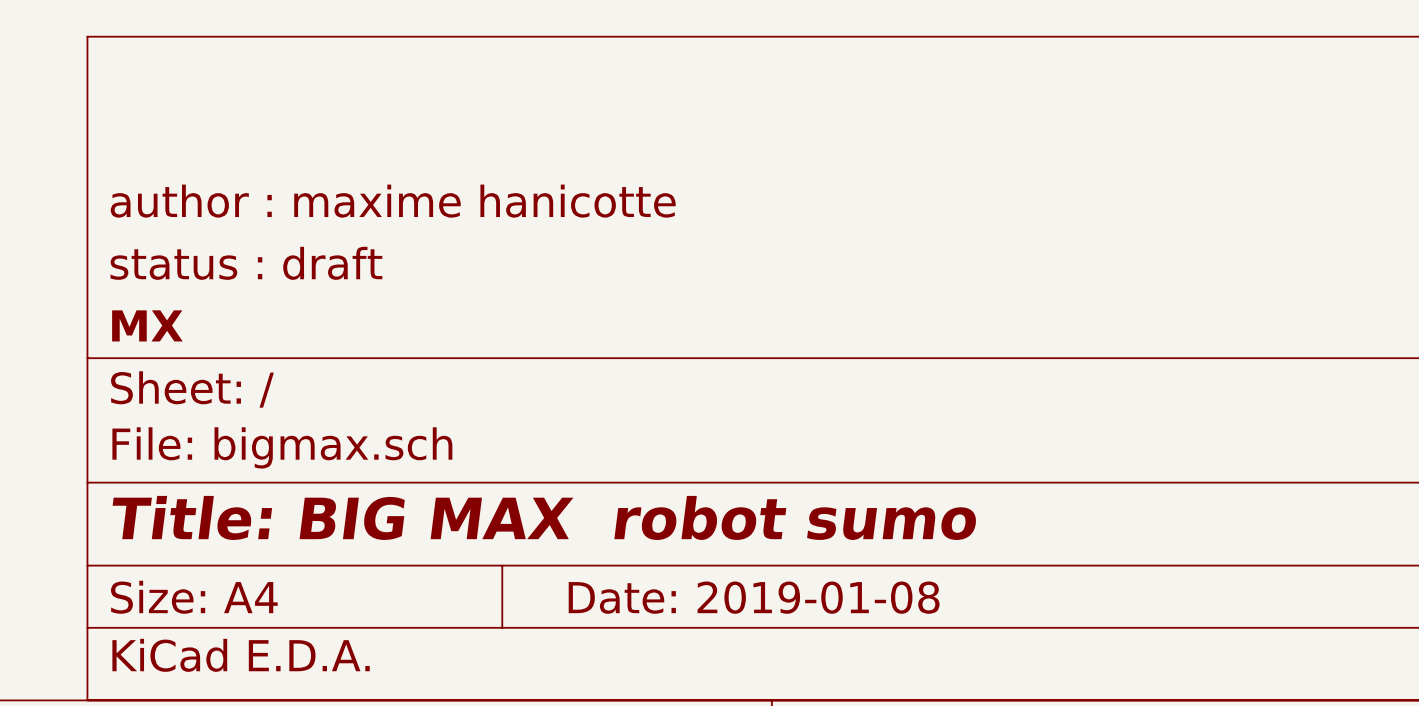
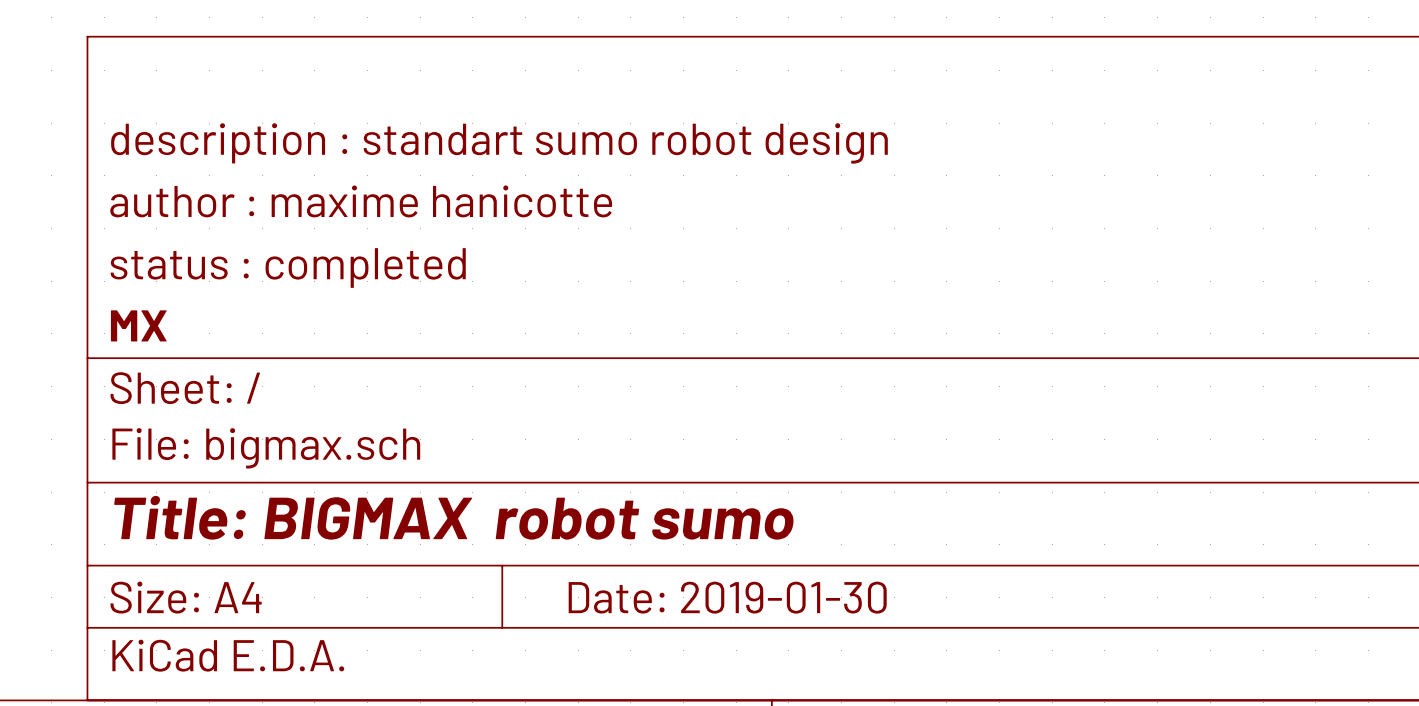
title block: none -> description : standart sumo robot design (499, 143)
title block: status : draft (246, 263) -> status : completed (288, 268)
title block: Title: BIG MAX robot sumo (544, 517) -> Title: BIGMAX robot sumo (453, 517)
title block: Date: 2019-01-08 (754, 597) -> Date: 2019-01-30 (727, 597)

